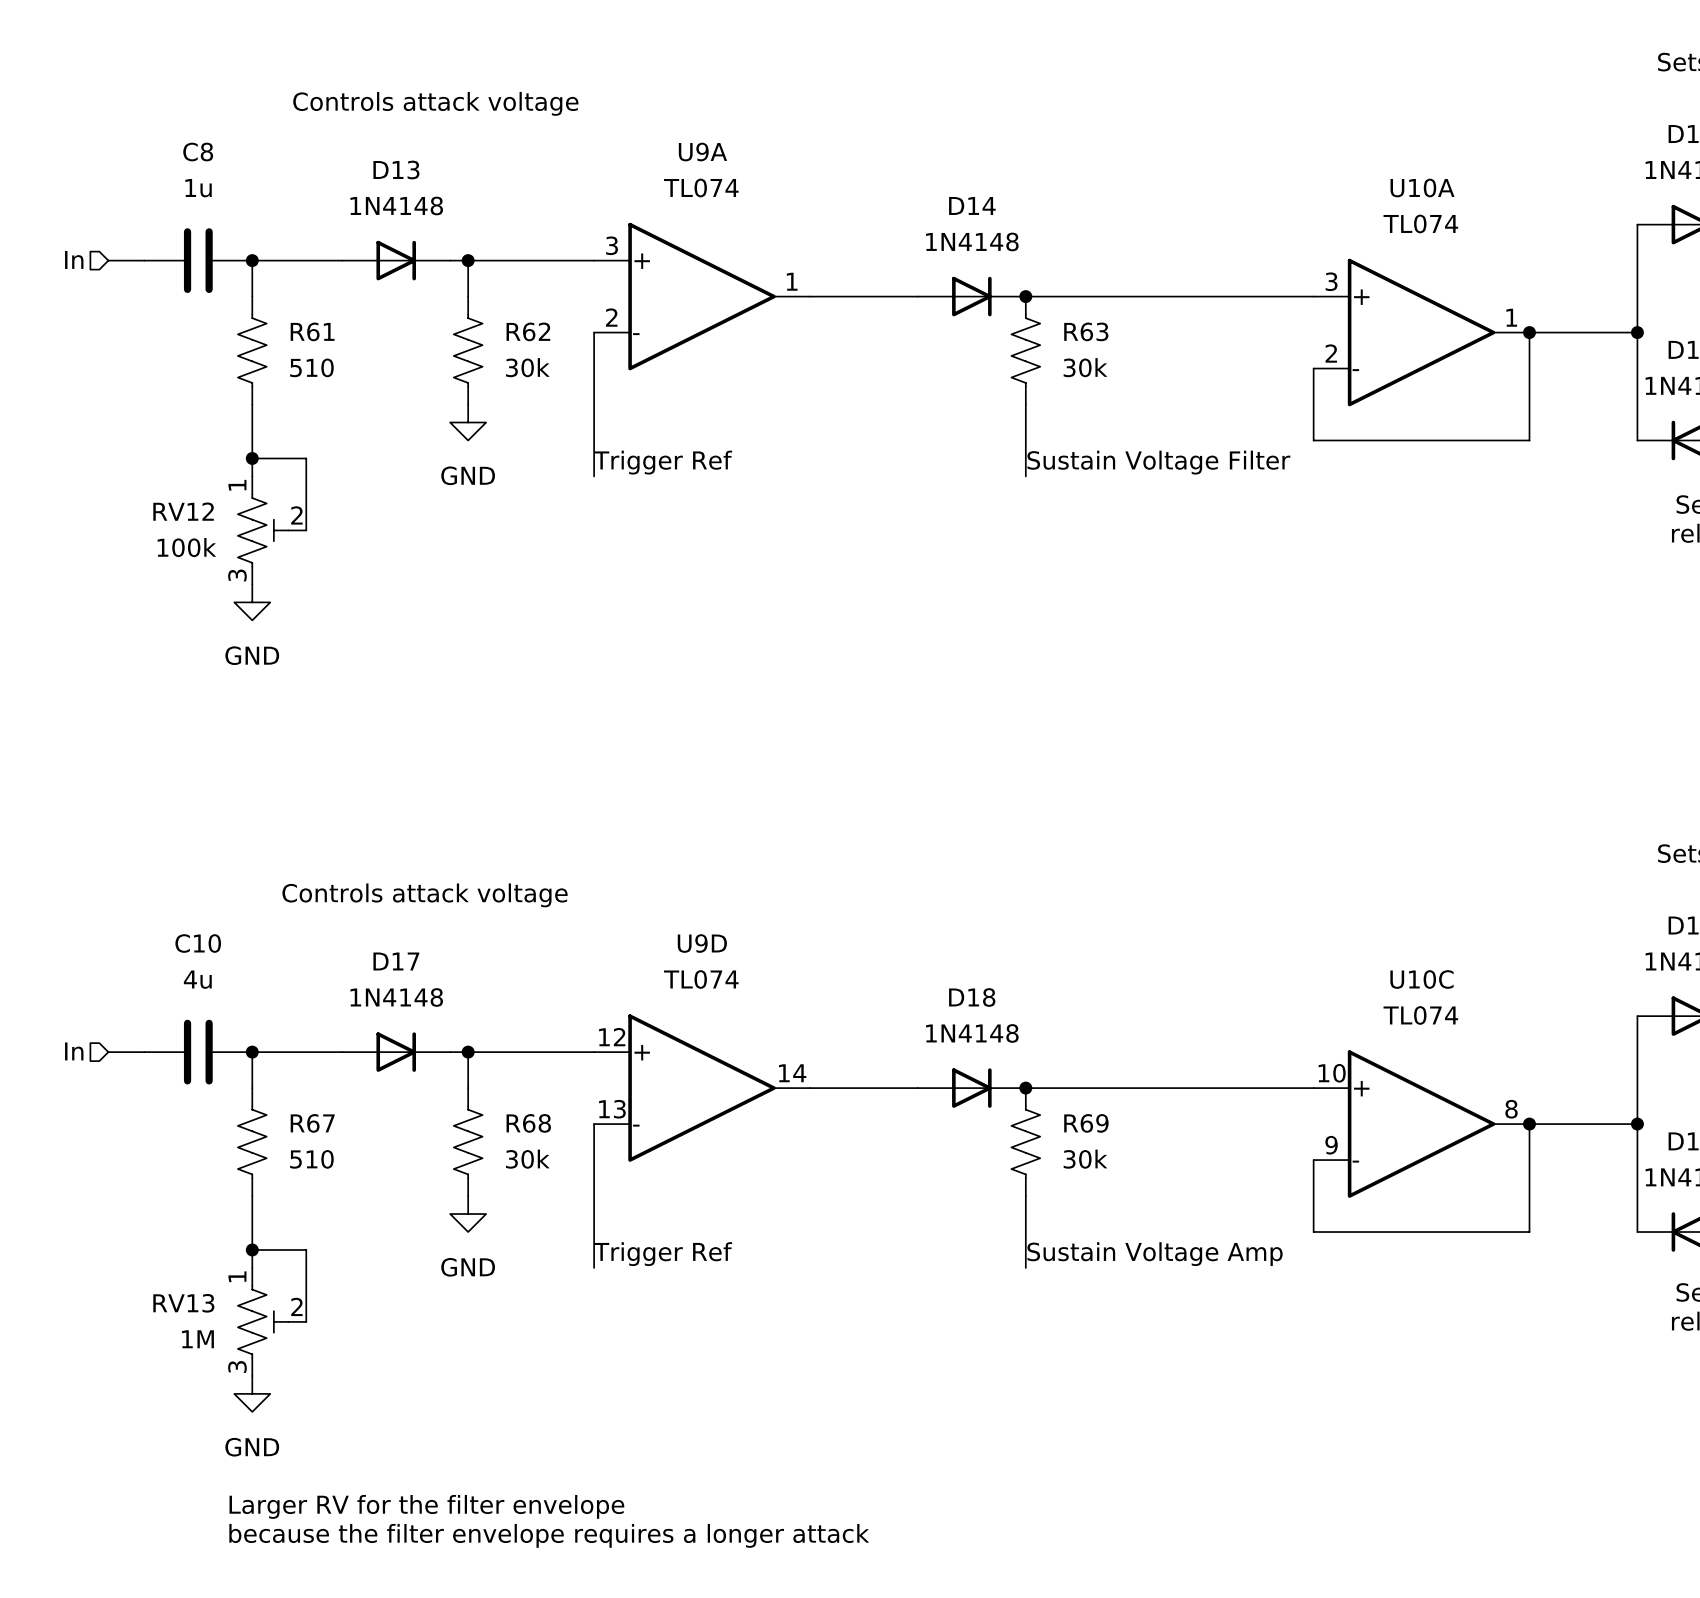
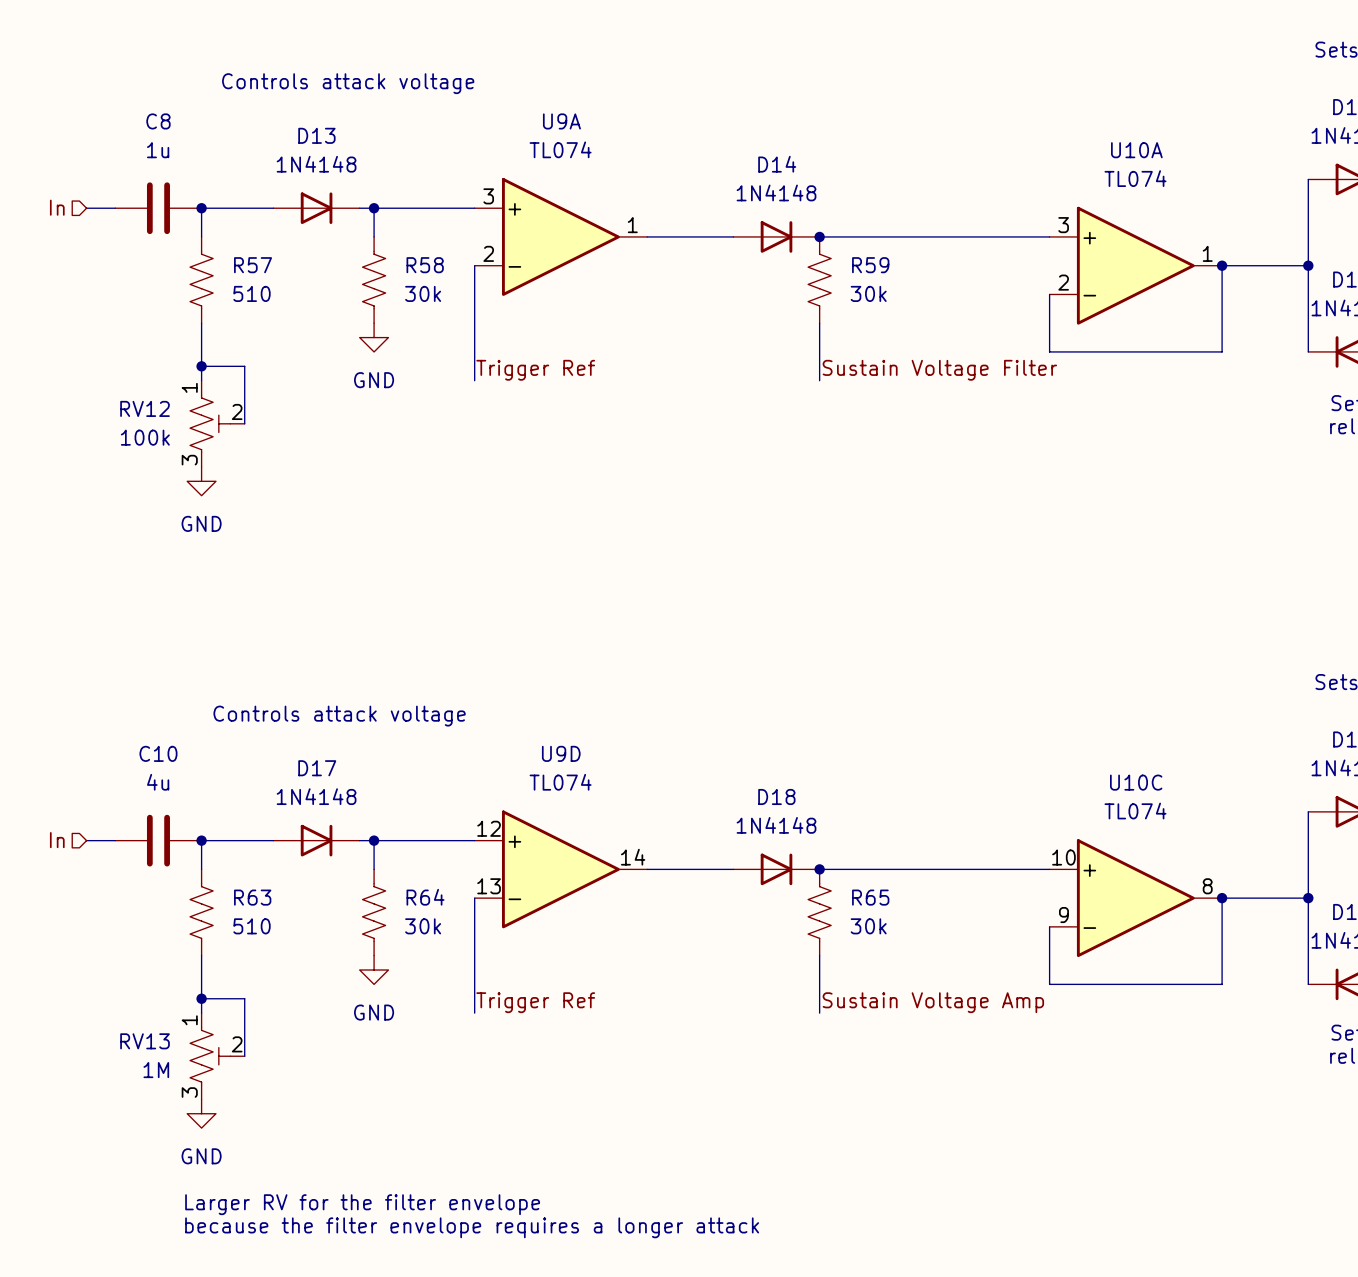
R61 name: R61 (312, 331) -> R57 (253, 265)
R62 name: R62 (528, 331) -> R58 (425, 265)
R63 name: R63 (1086, 331) -> R59 (870, 265)
R67 name: R67 (312, 1123) -> R63 (252, 897)
R68 name: R68 (528, 1123) -> R64 (425, 897)
R69 name: R69 (1086, 1123) -> R65 (870, 897)

